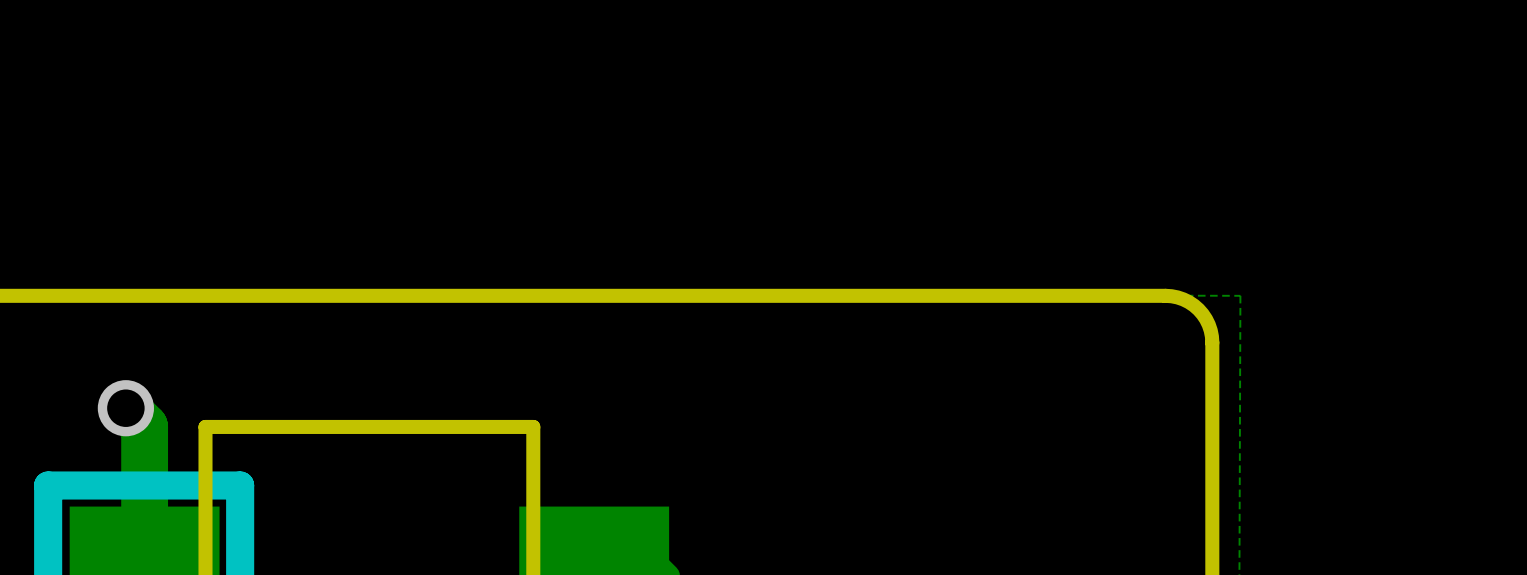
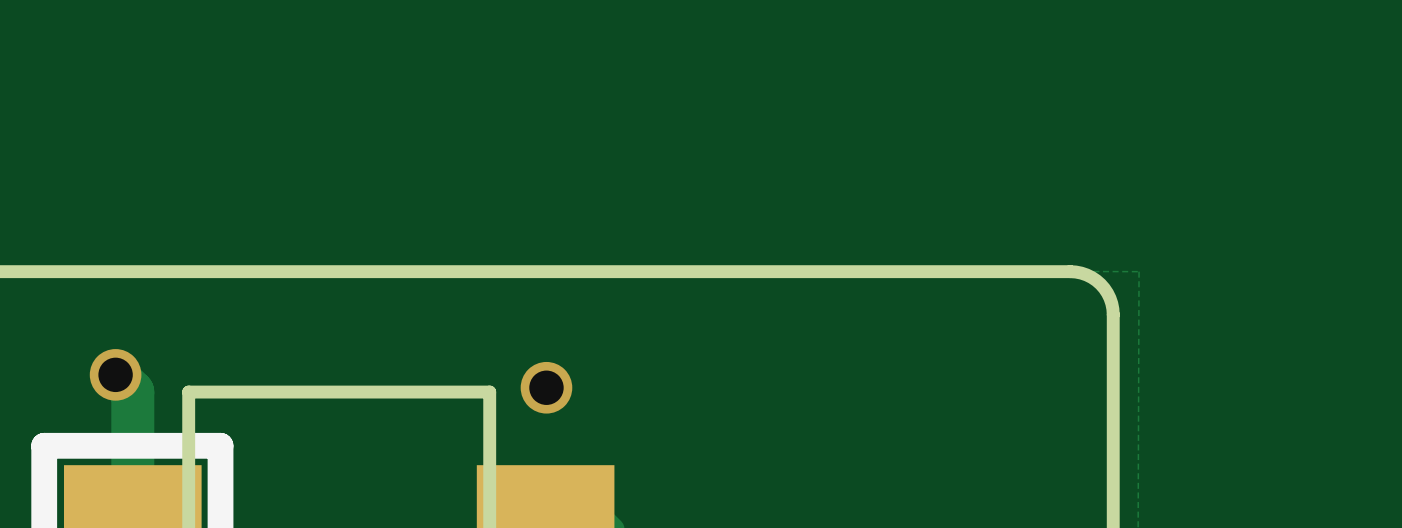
via: none -> (546, 387)

